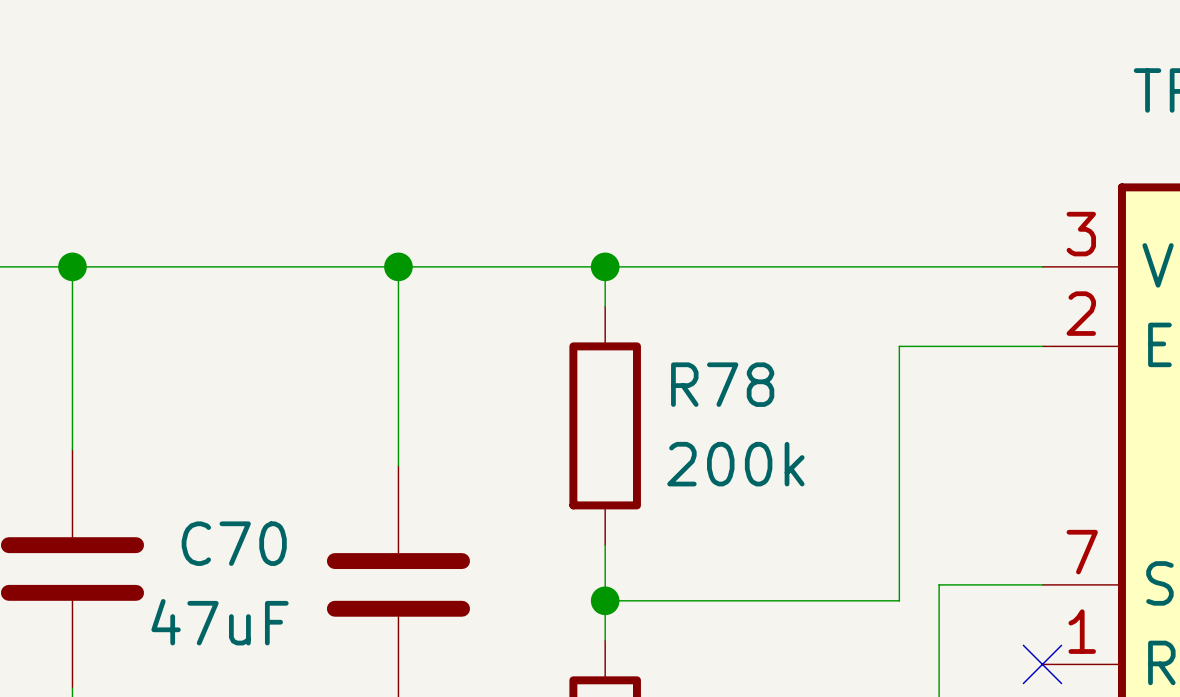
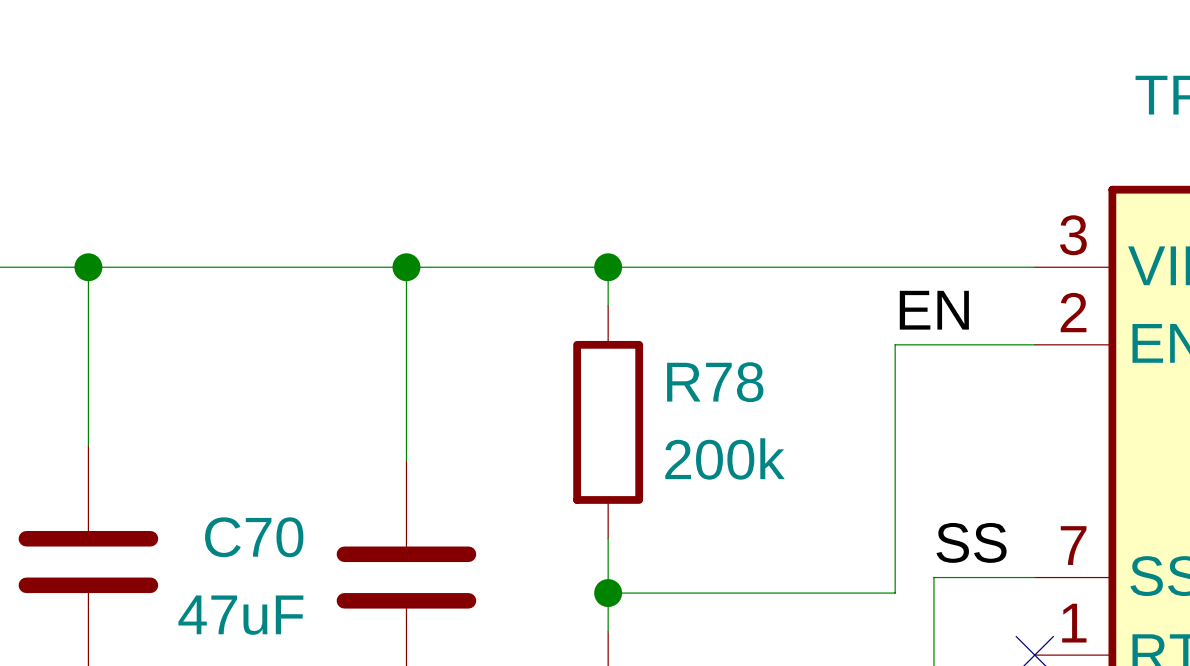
label: none -> EN (934, 310)
label: none -> SS (971, 542)

